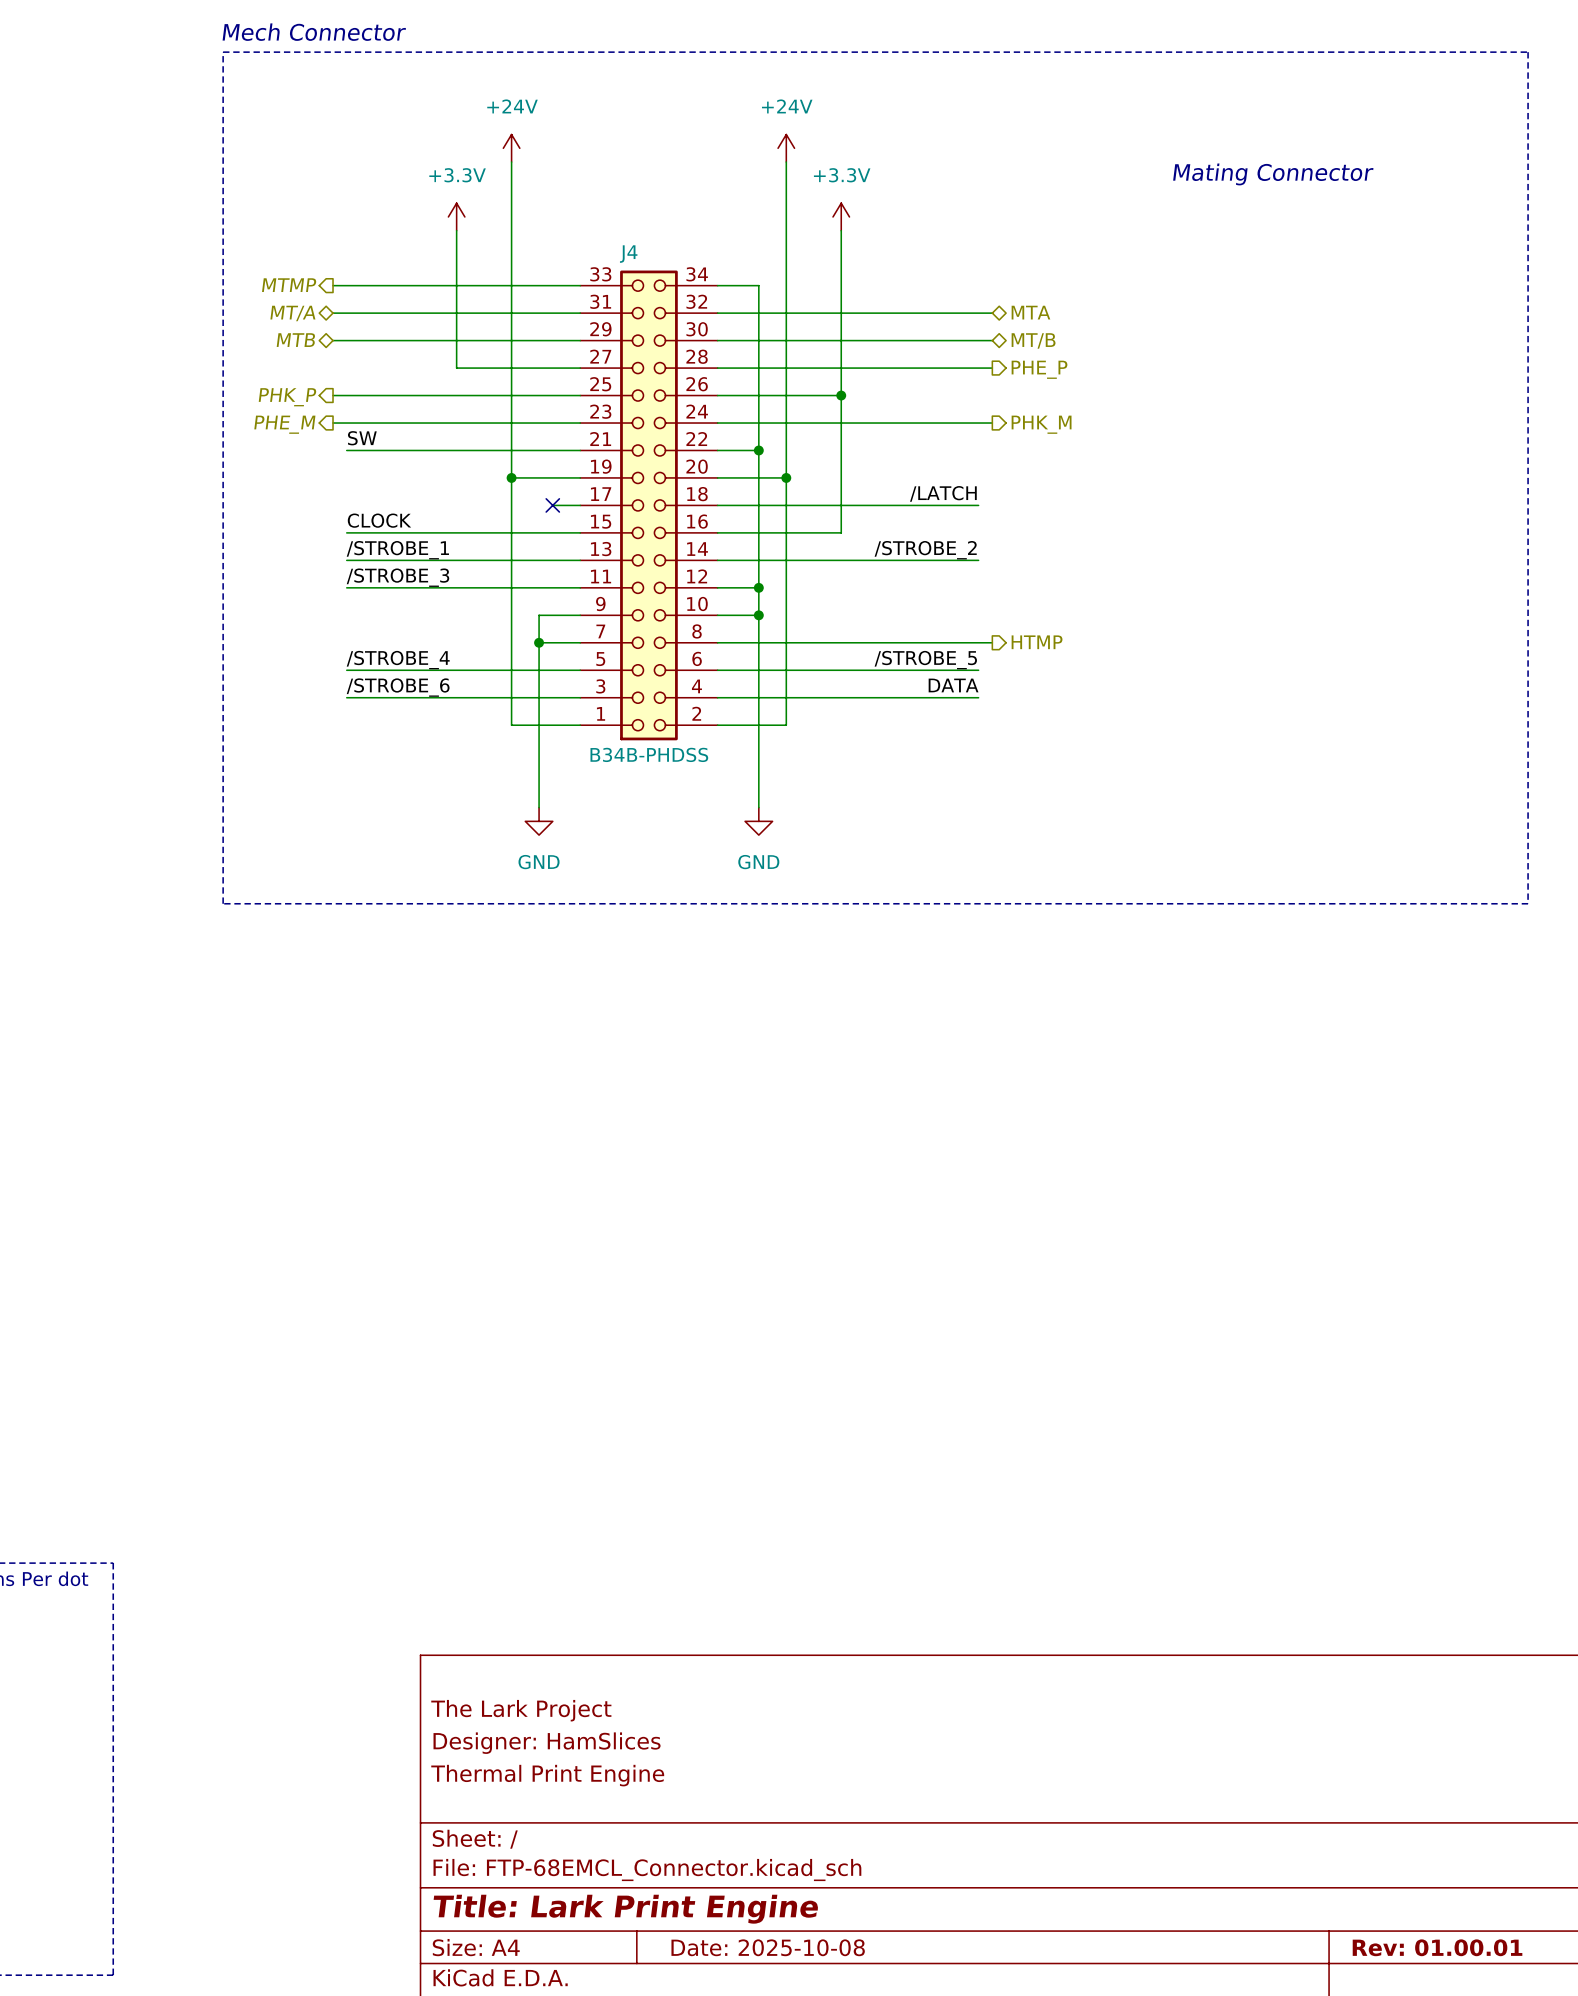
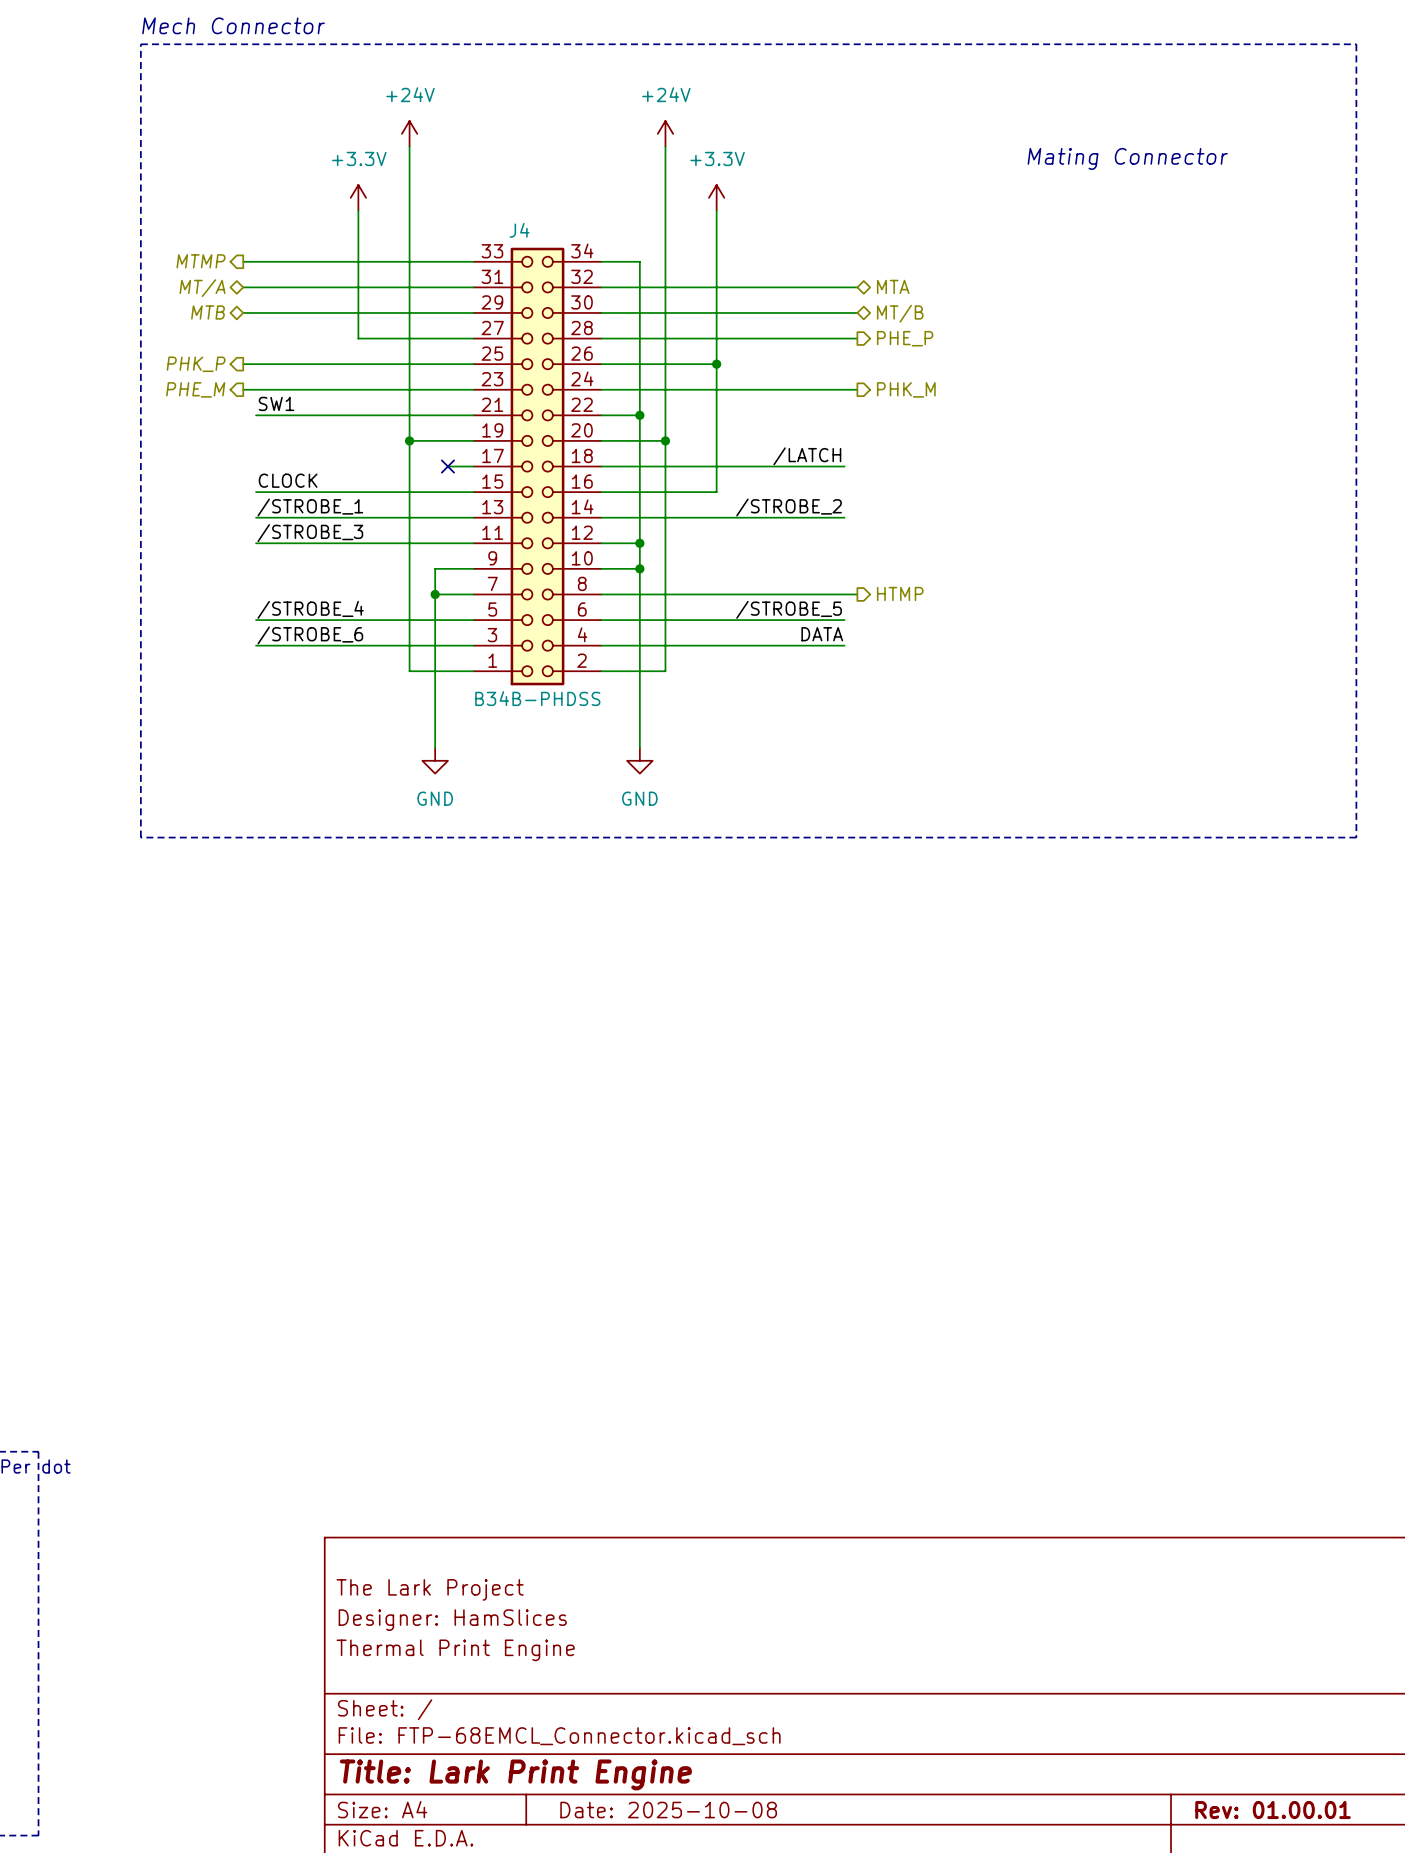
label: SW (362, 438) -> SW1 (276, 403)

